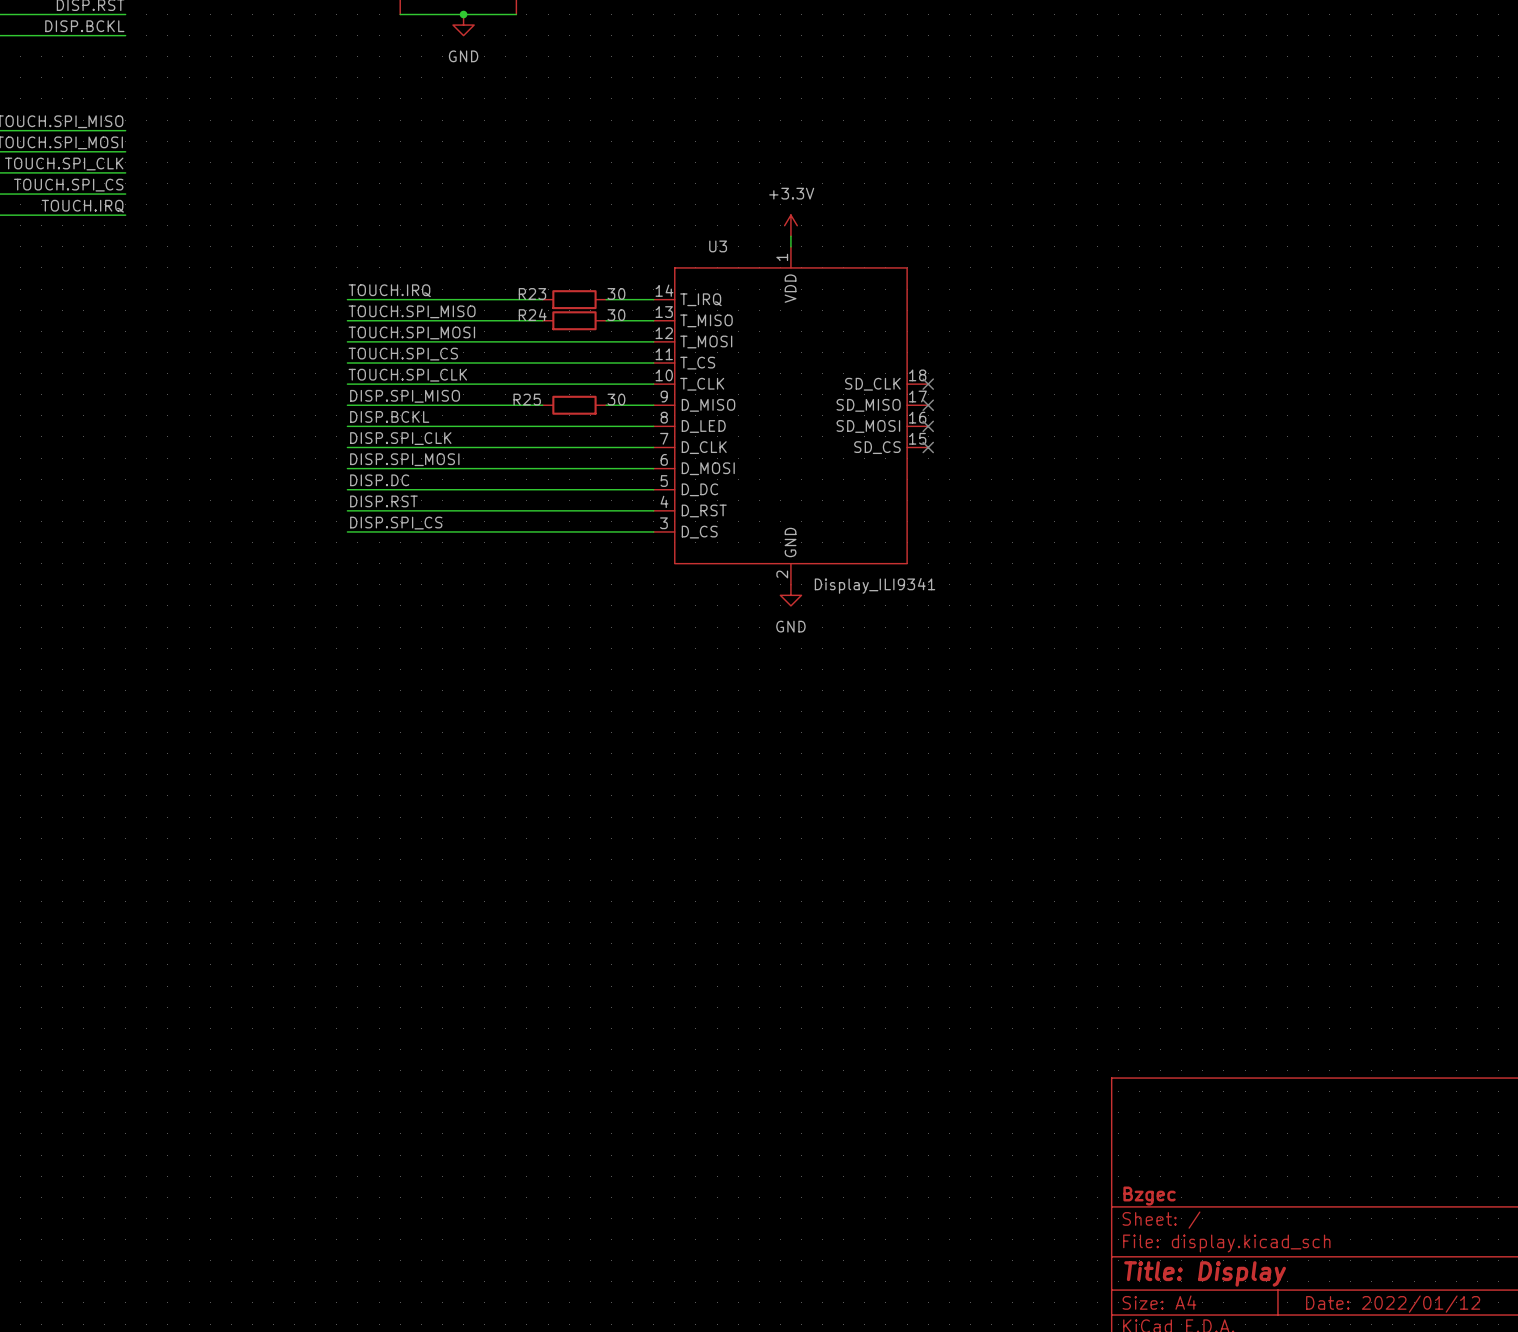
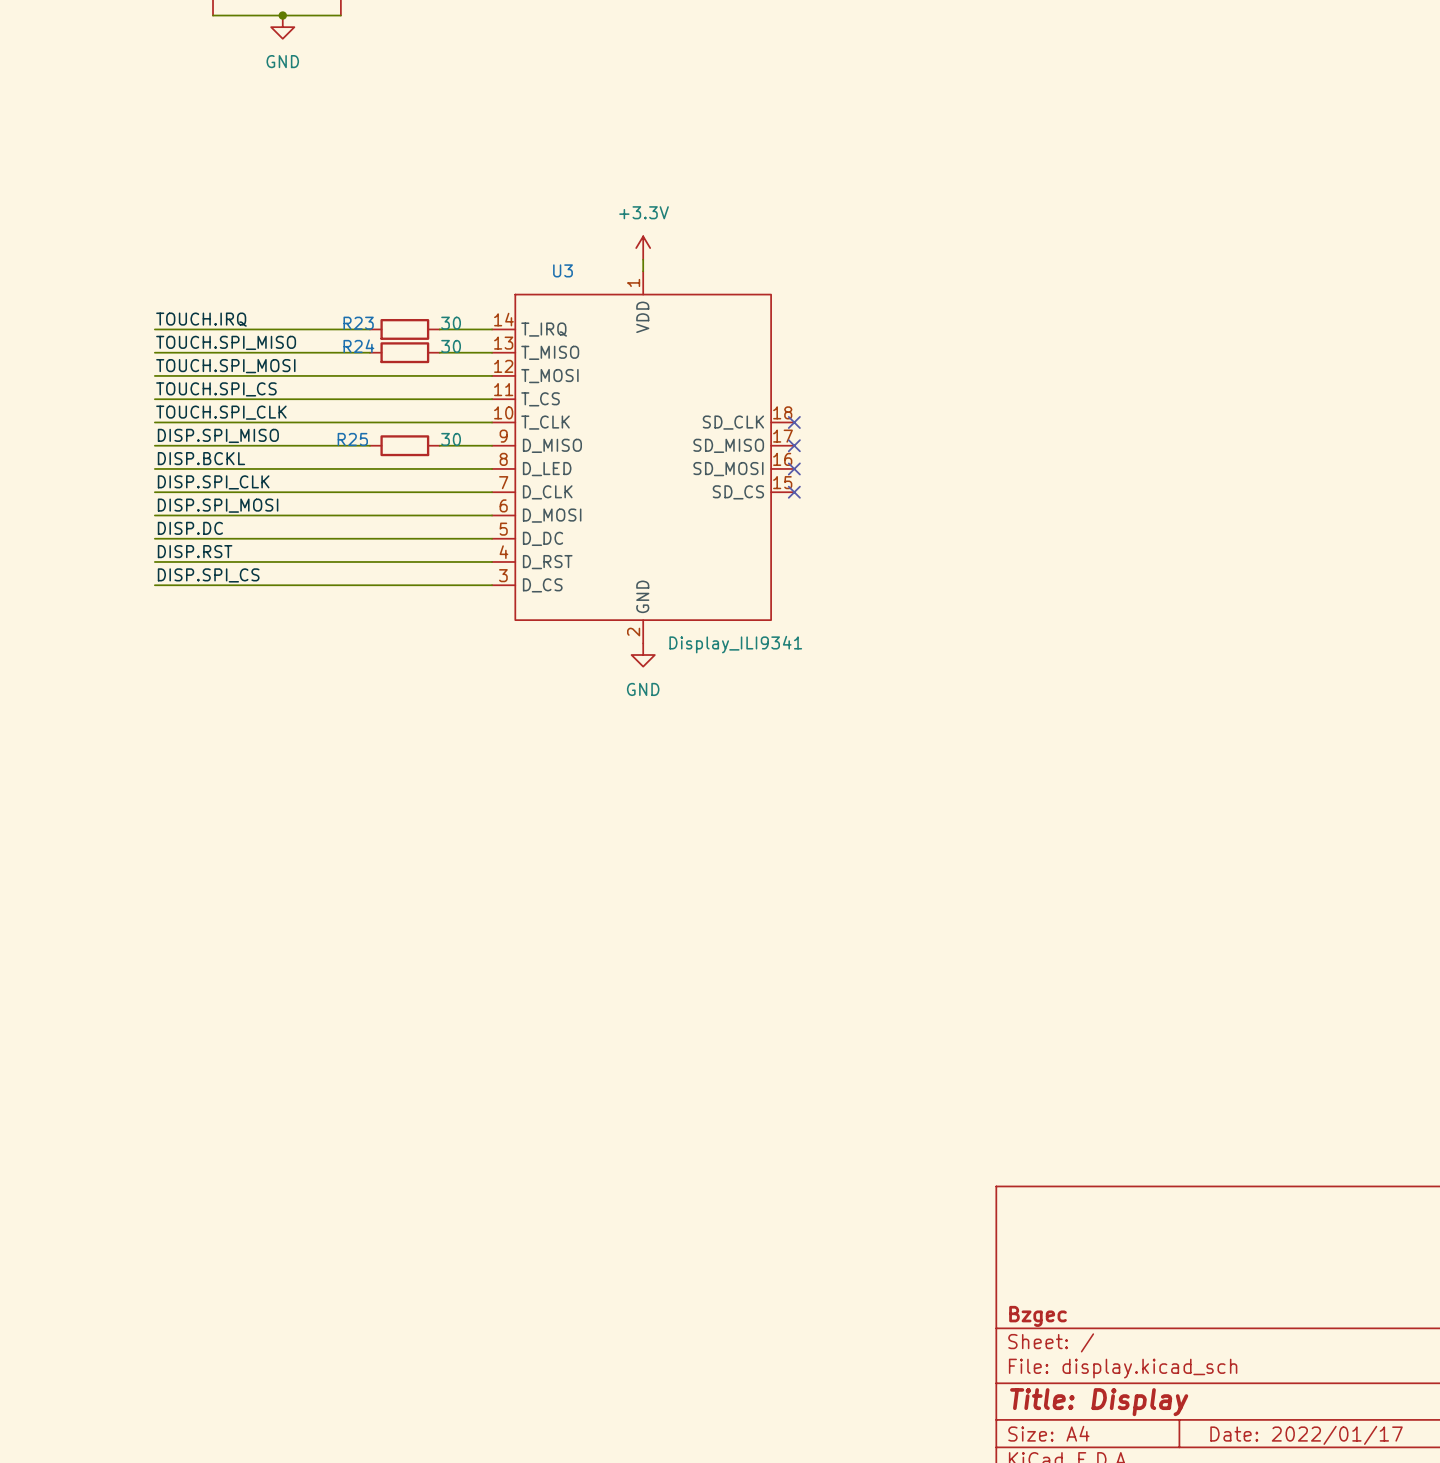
title block: Date: 2022/01/12 (1393, 1304) -> Date: 2022/01/17 (1306, 1435)

